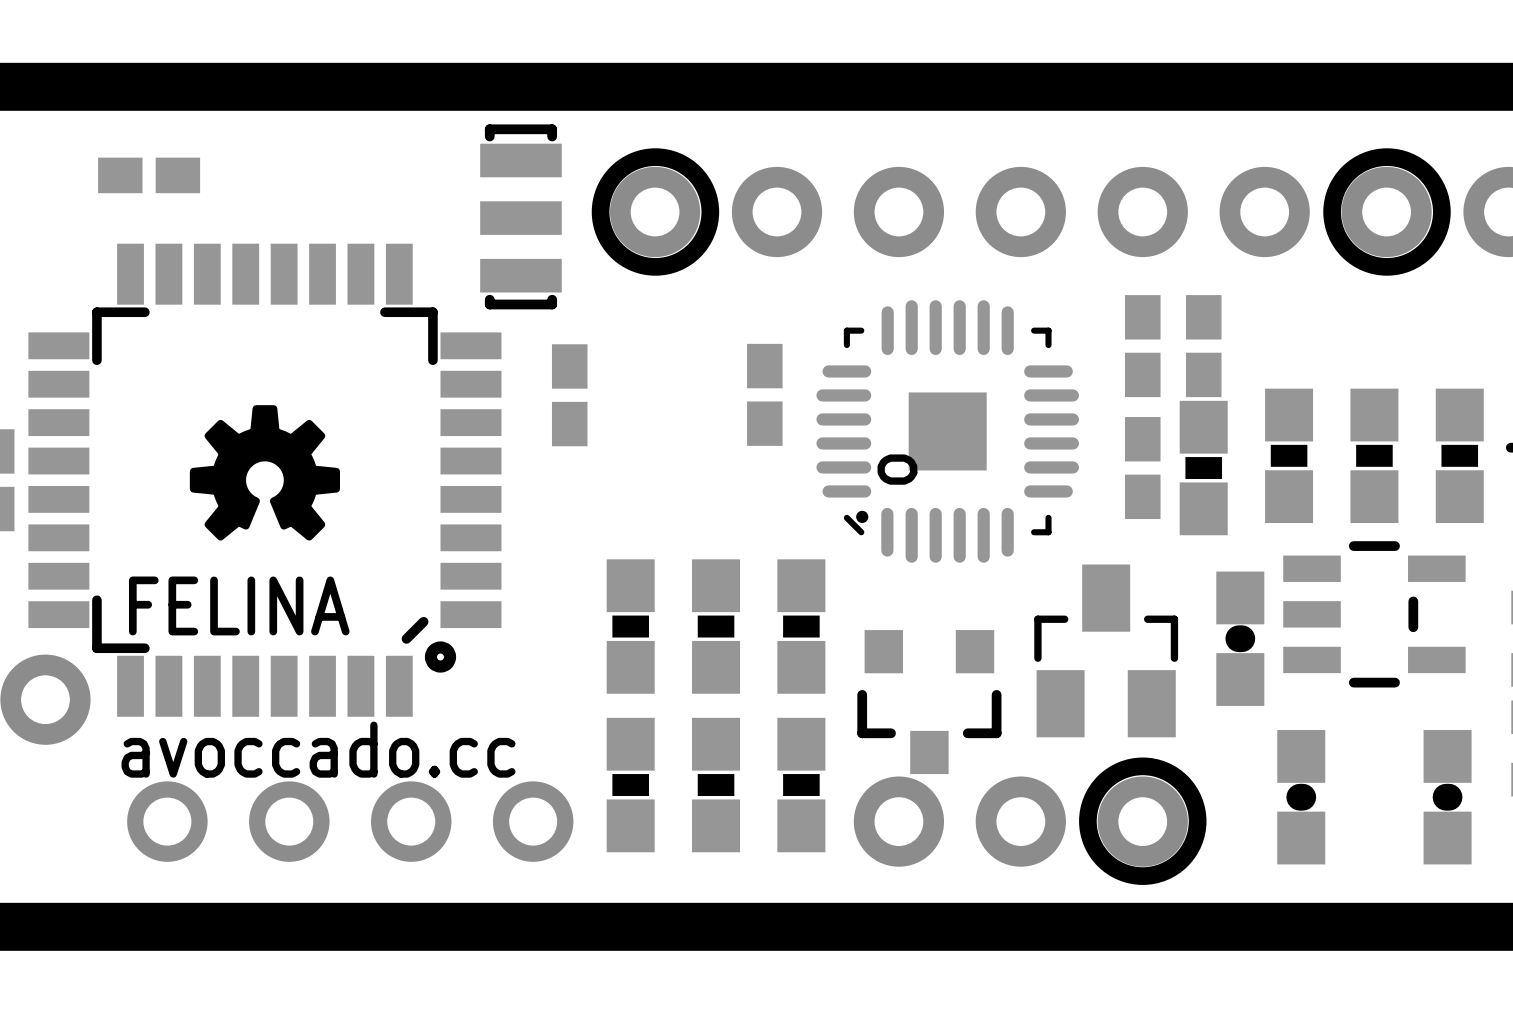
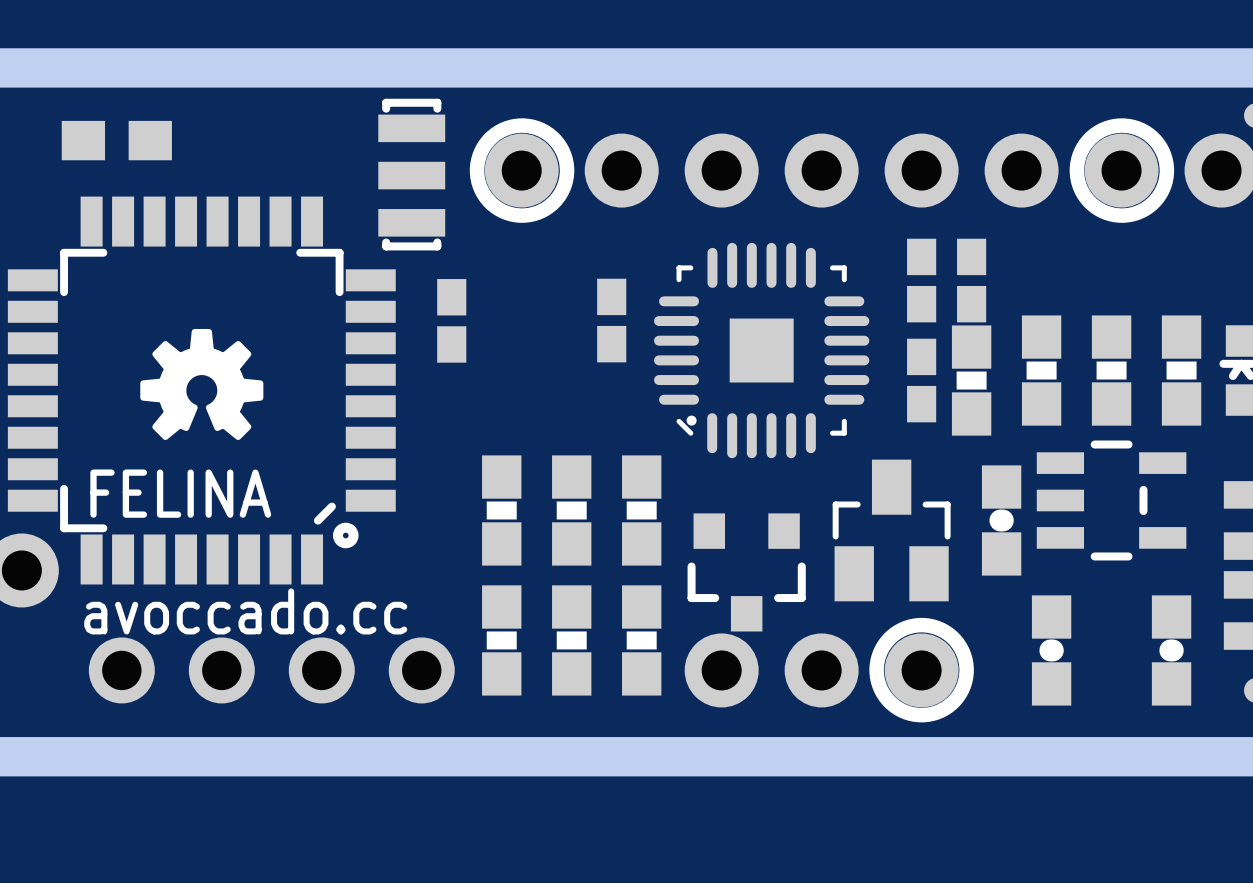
part footprint: [98, 157, 201, 194] -> [61, 120, 172, 161]
text: o (897, 469) -> none

